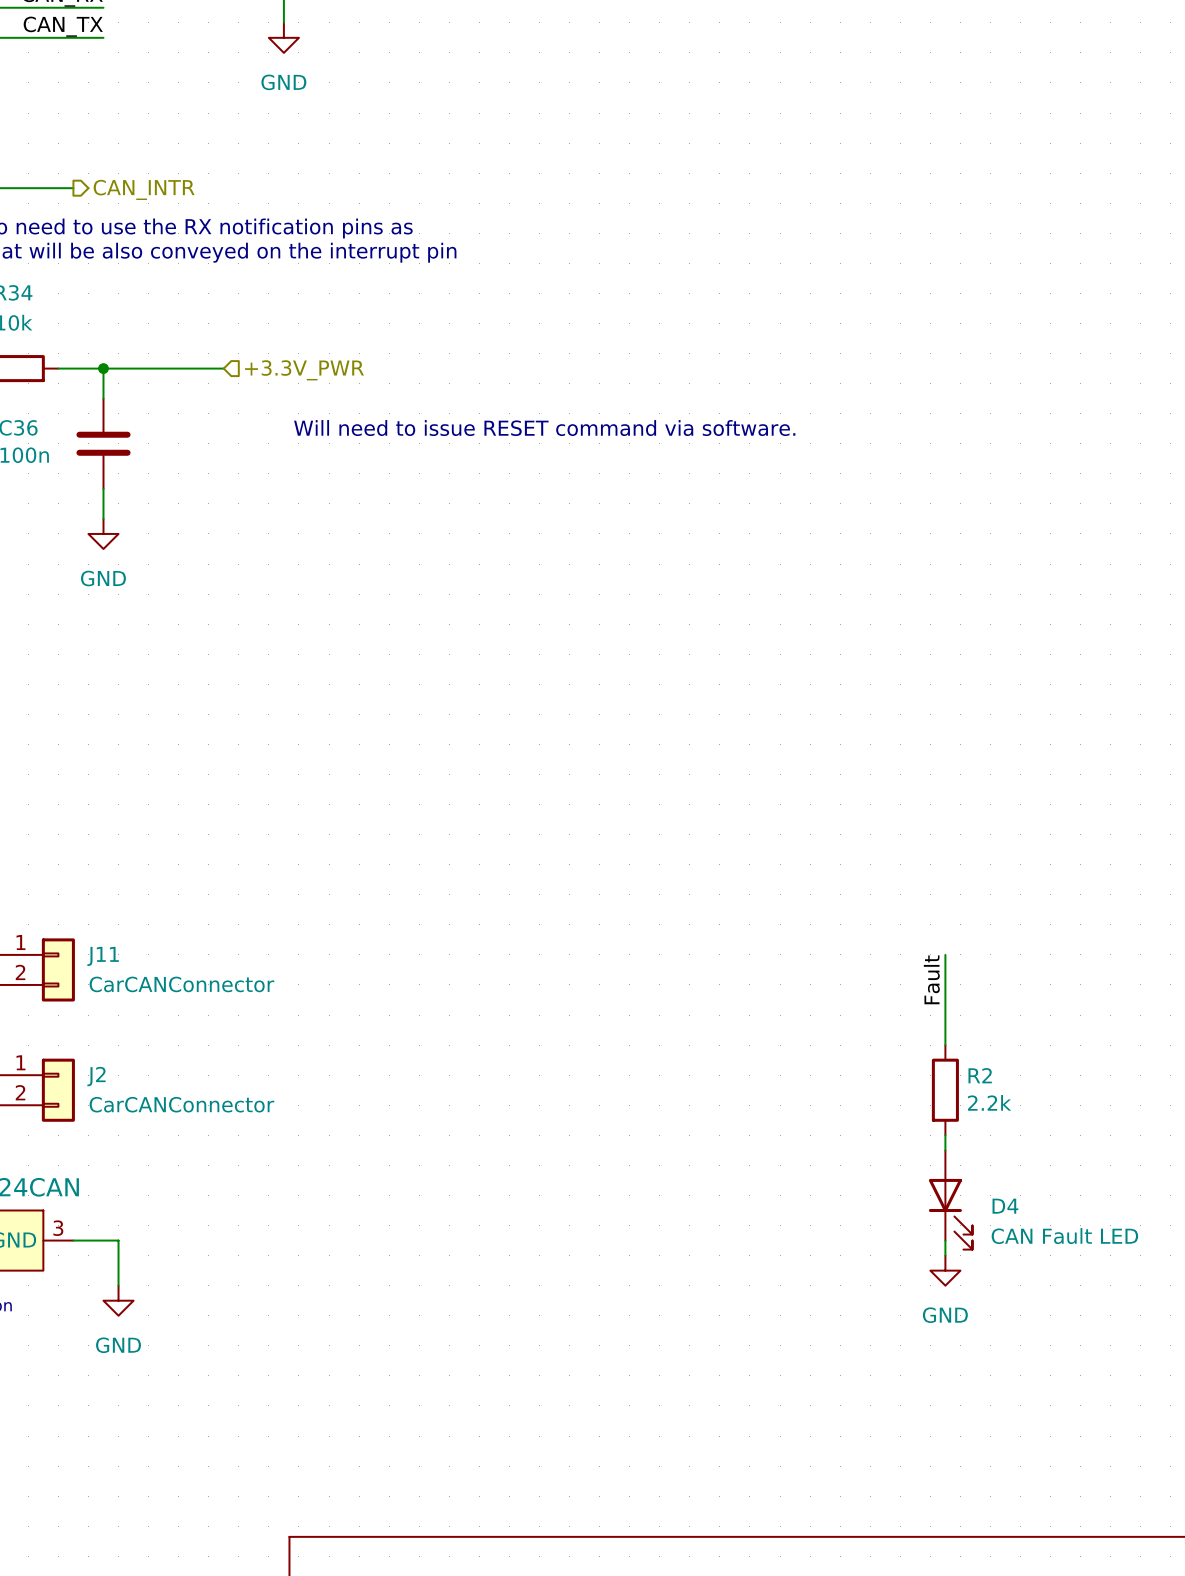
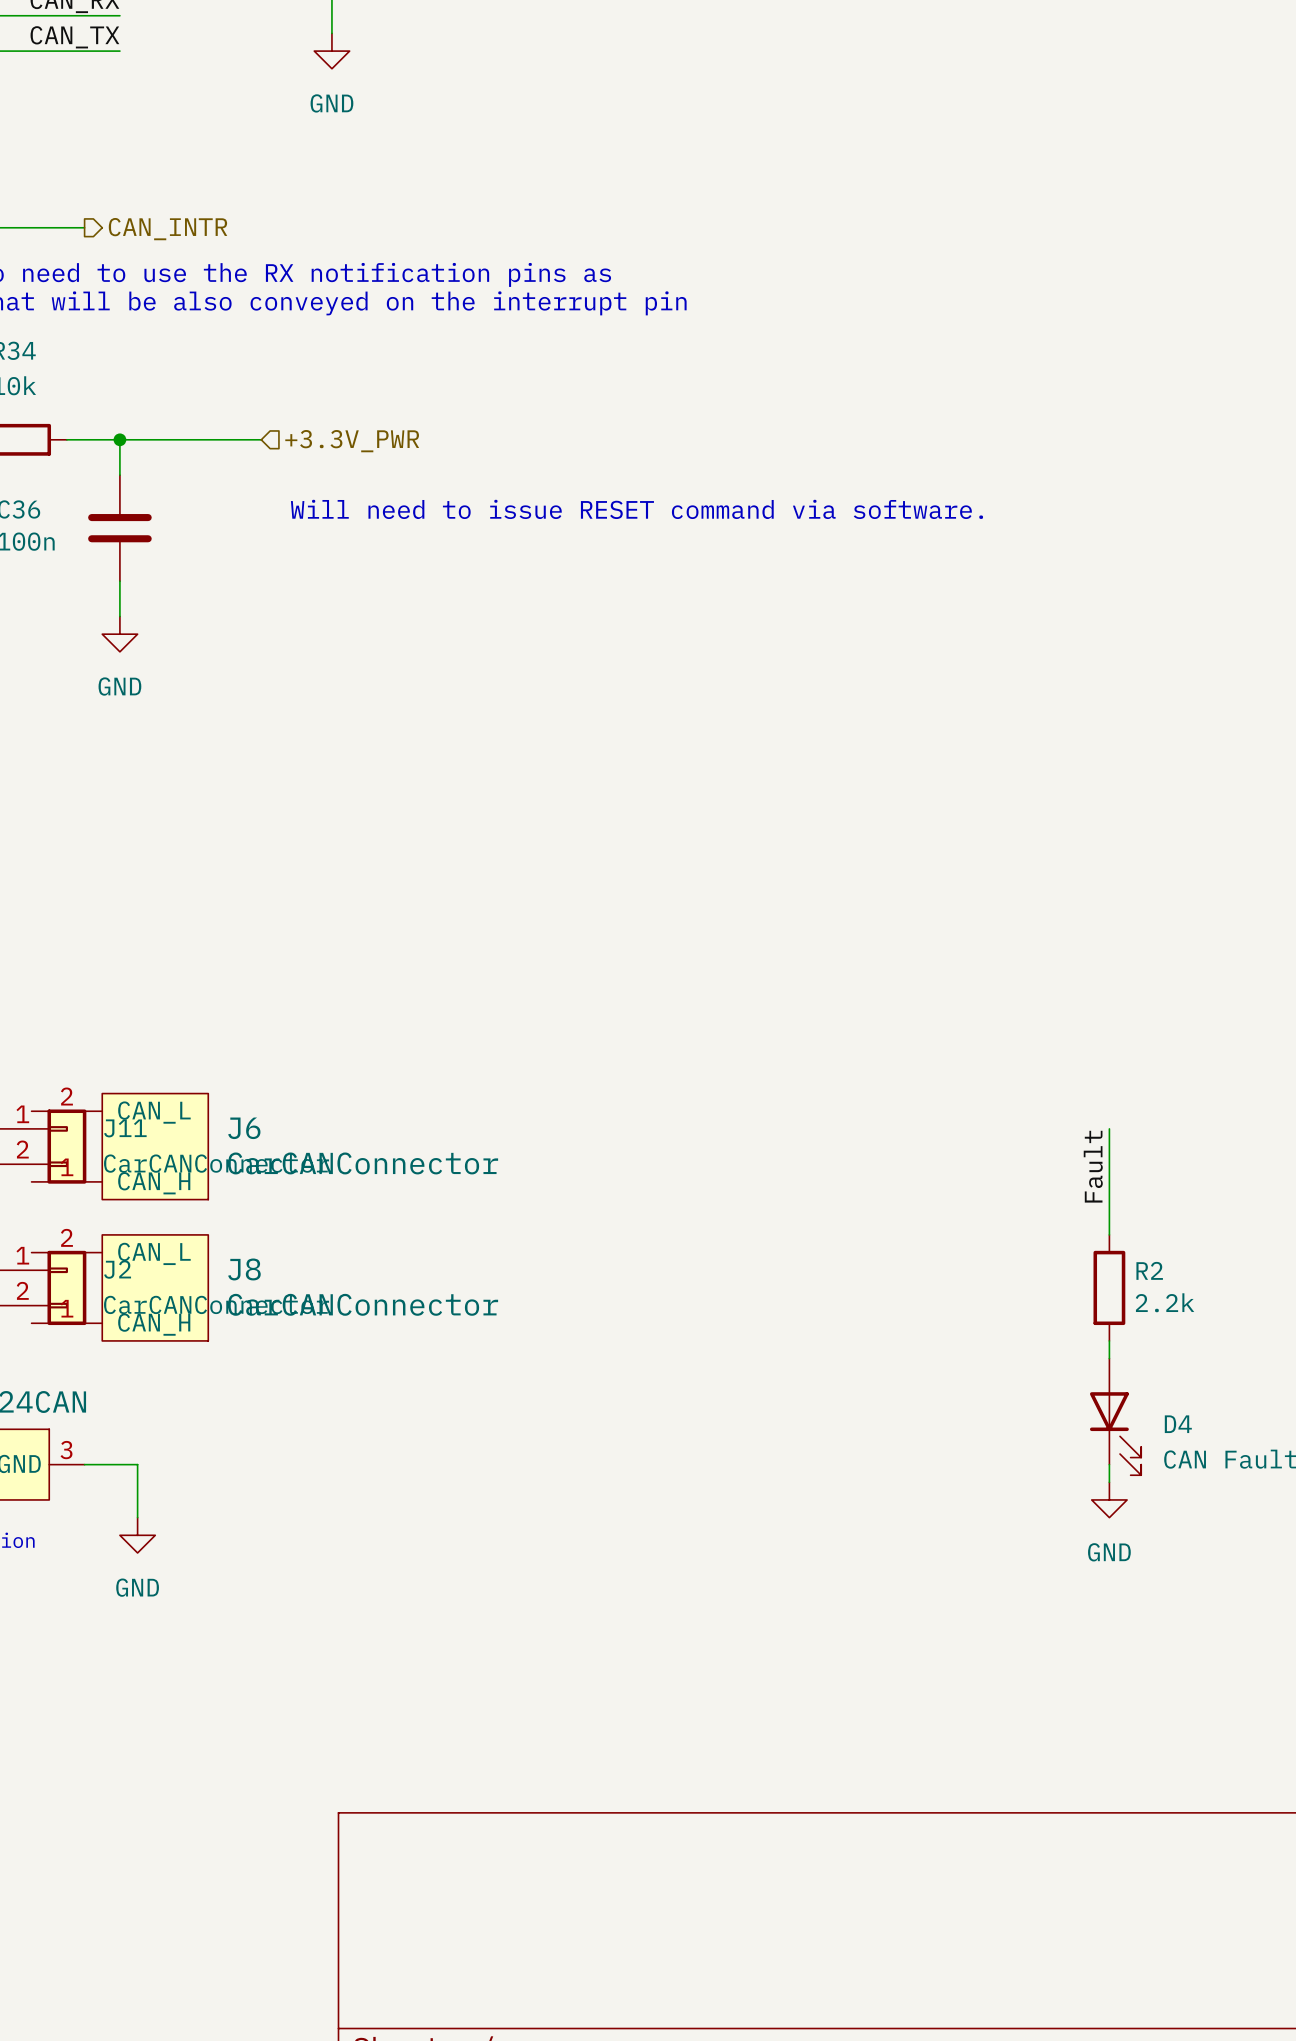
J6: none -> CarCANConnector (119, 1146)
J8: none -> CarCANConnector (119, 1287)

